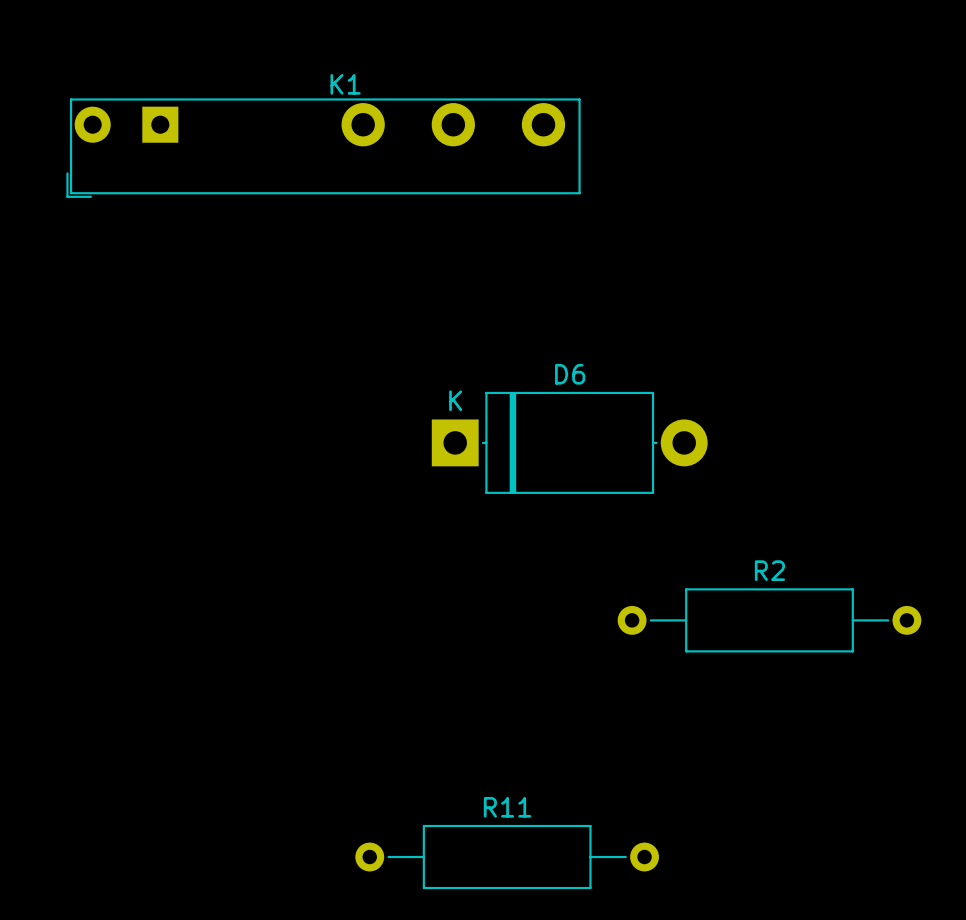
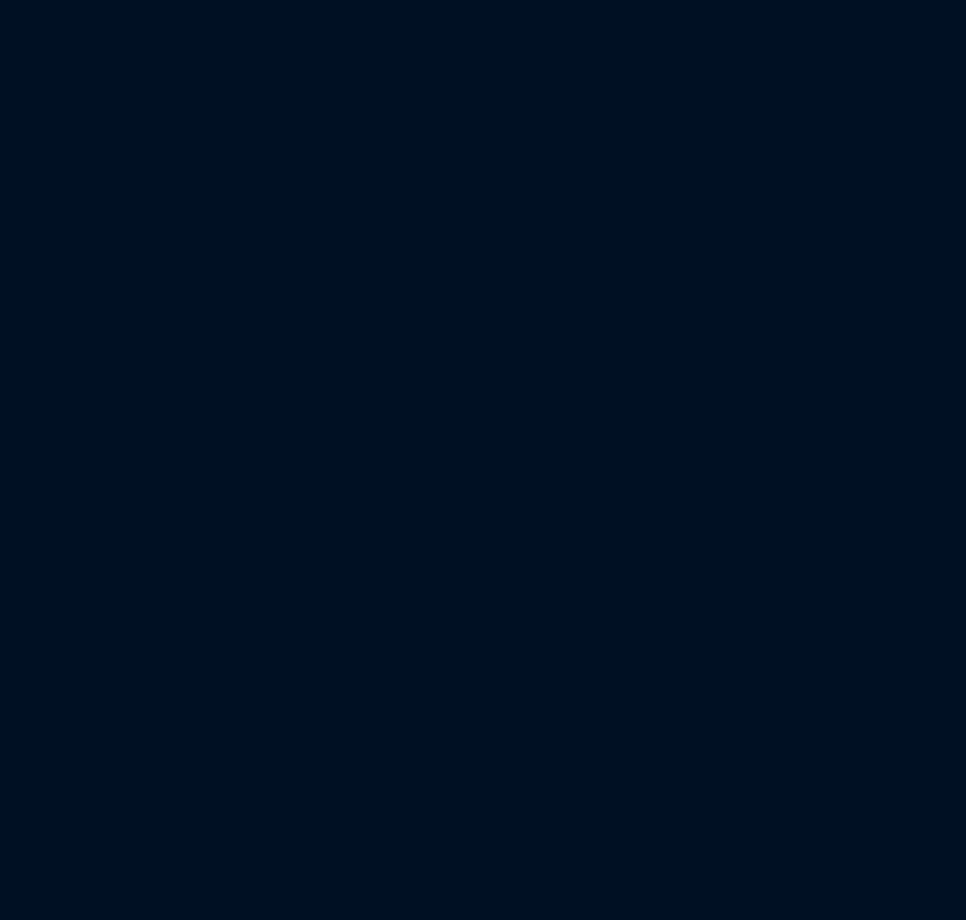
K1: (323, 148) -> none
D6: (569, 442) -> none
R2: (769, 620) -> none
R11: (507, 857) -> none

